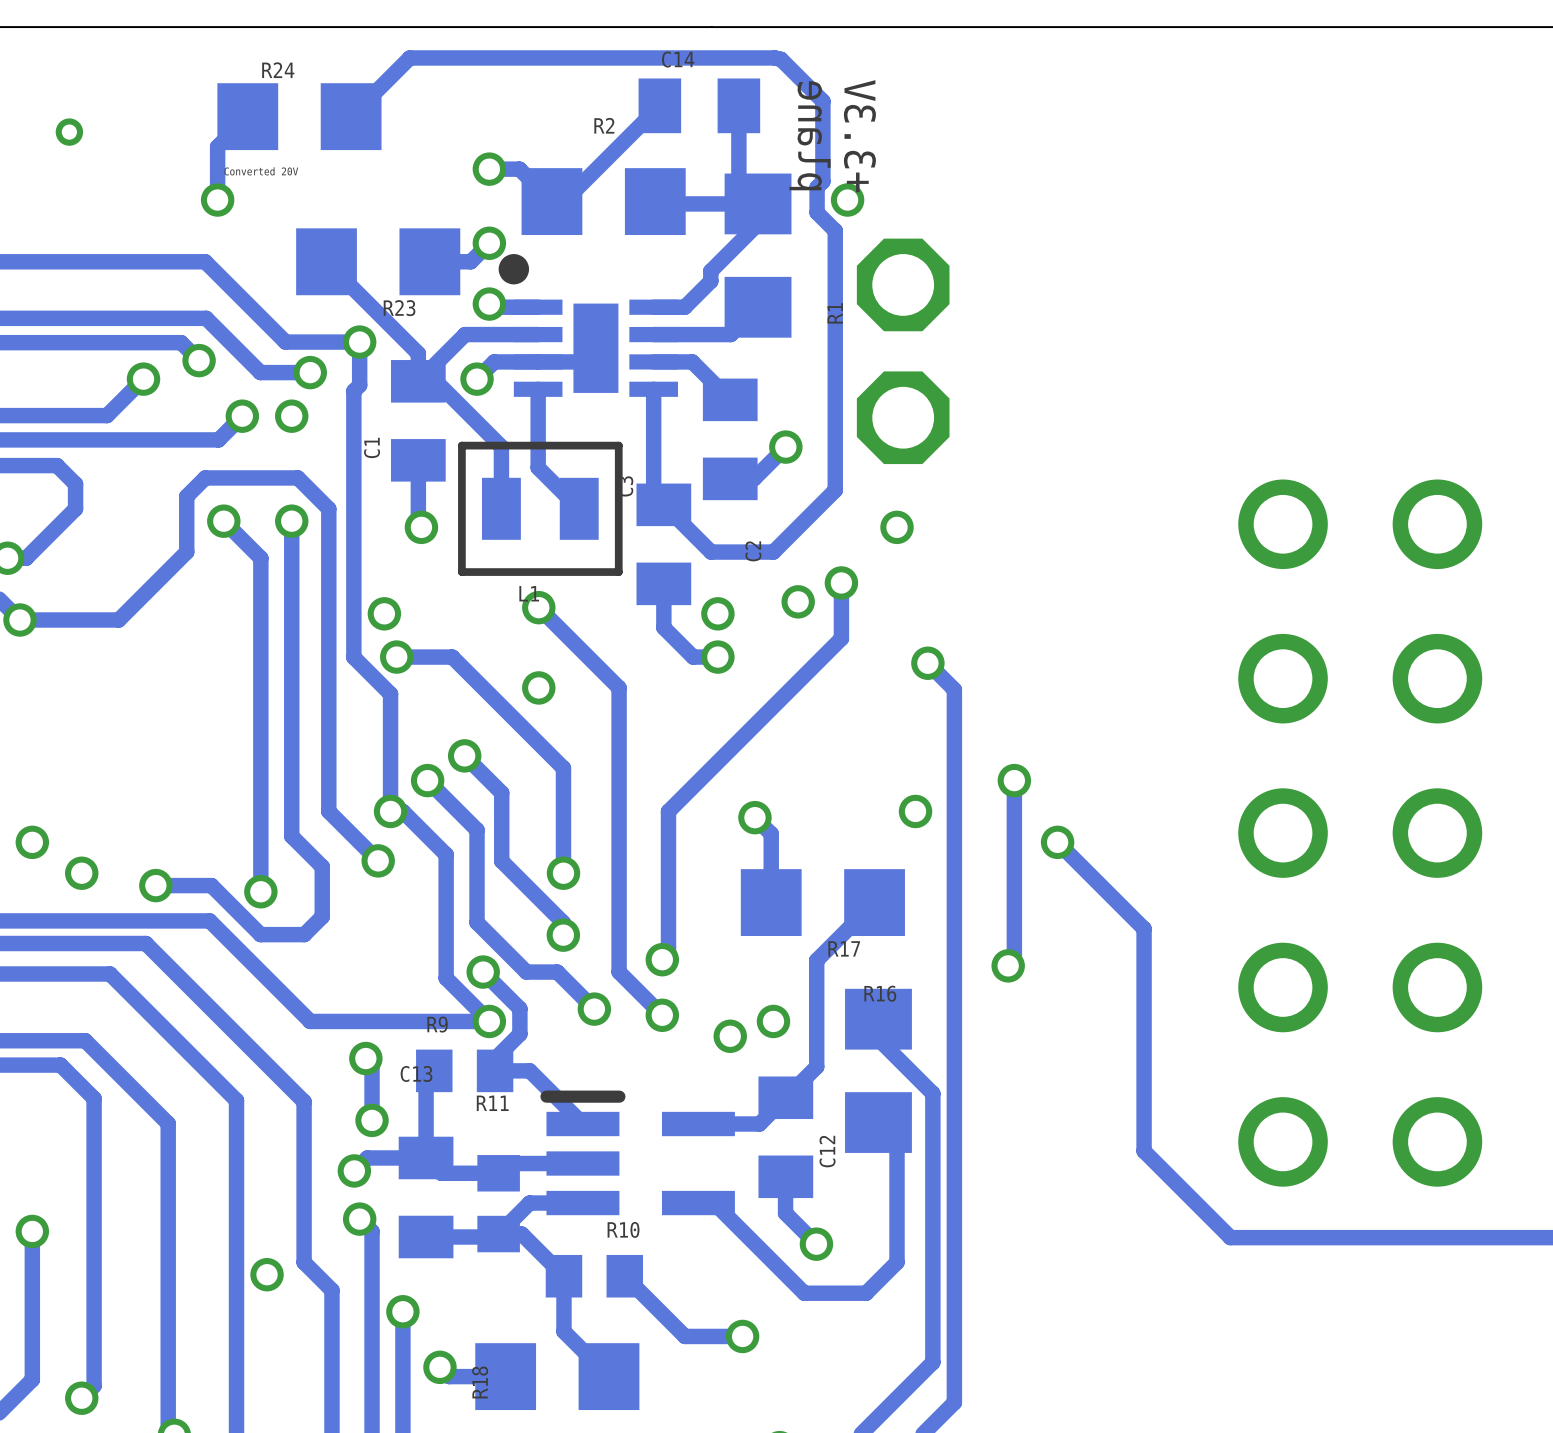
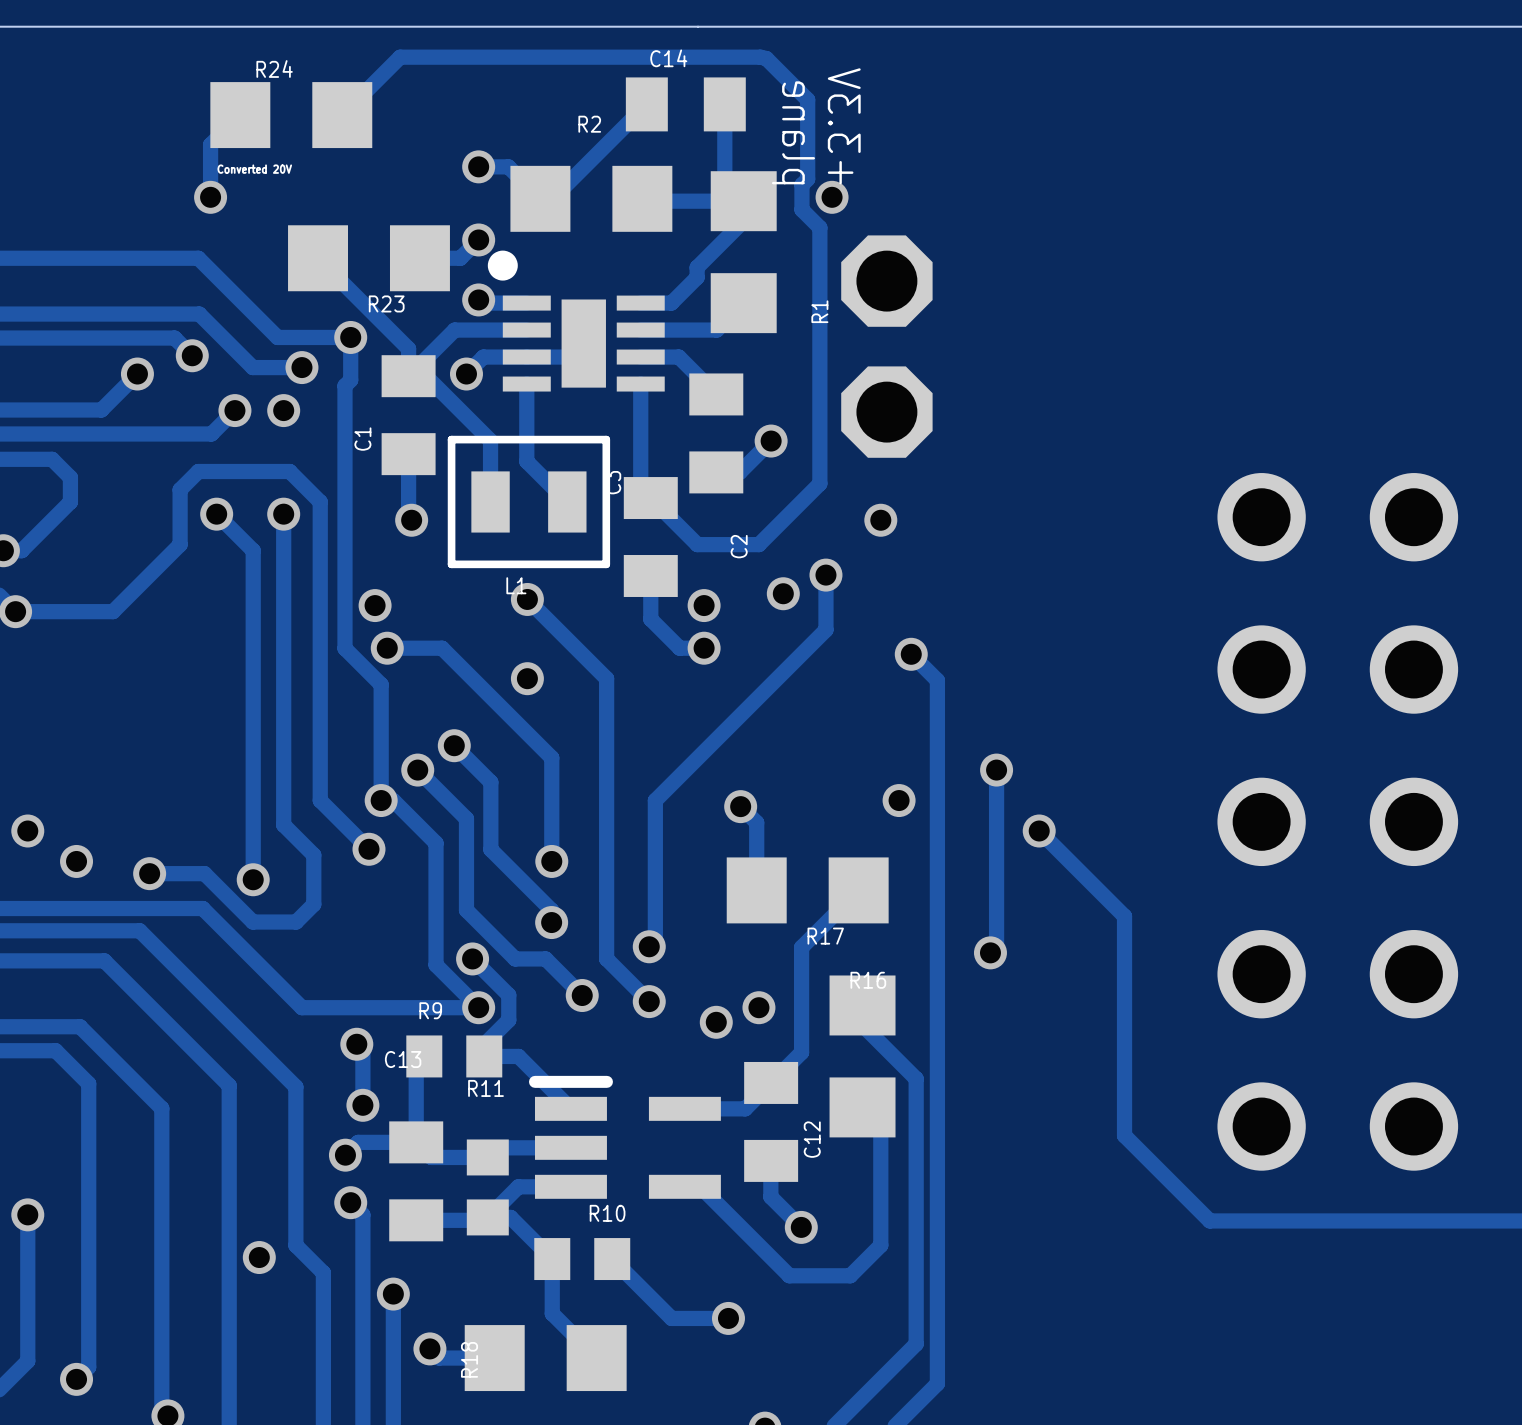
via: (69, 132) -> none

